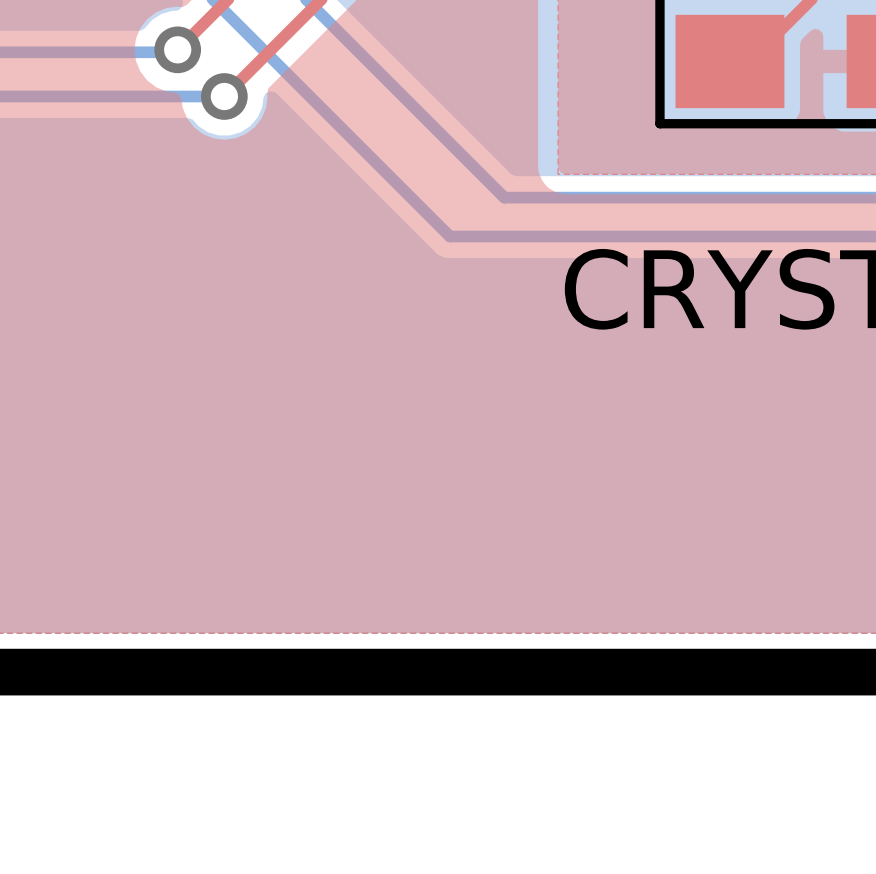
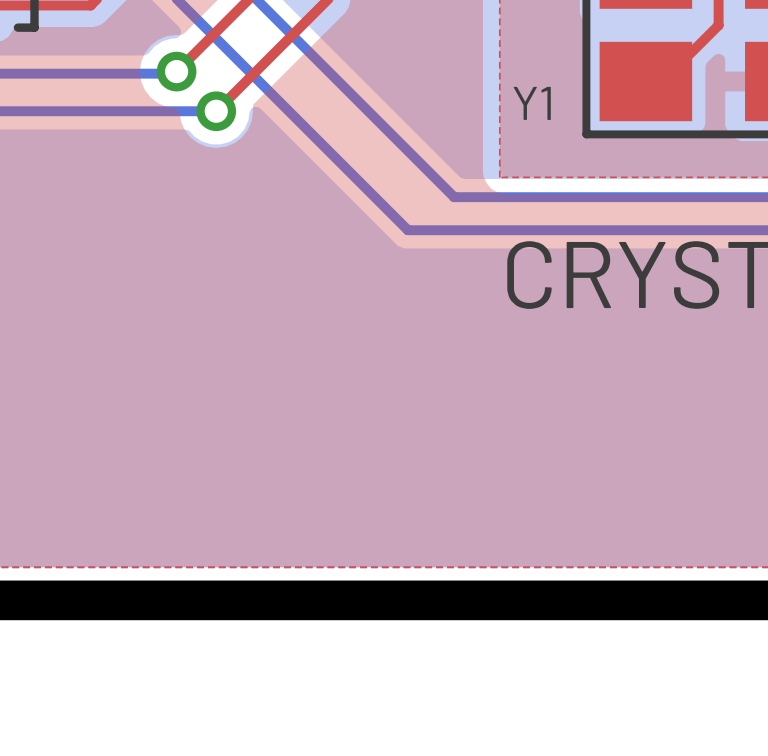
Y1 name: none -> Y1 (532, 103)

